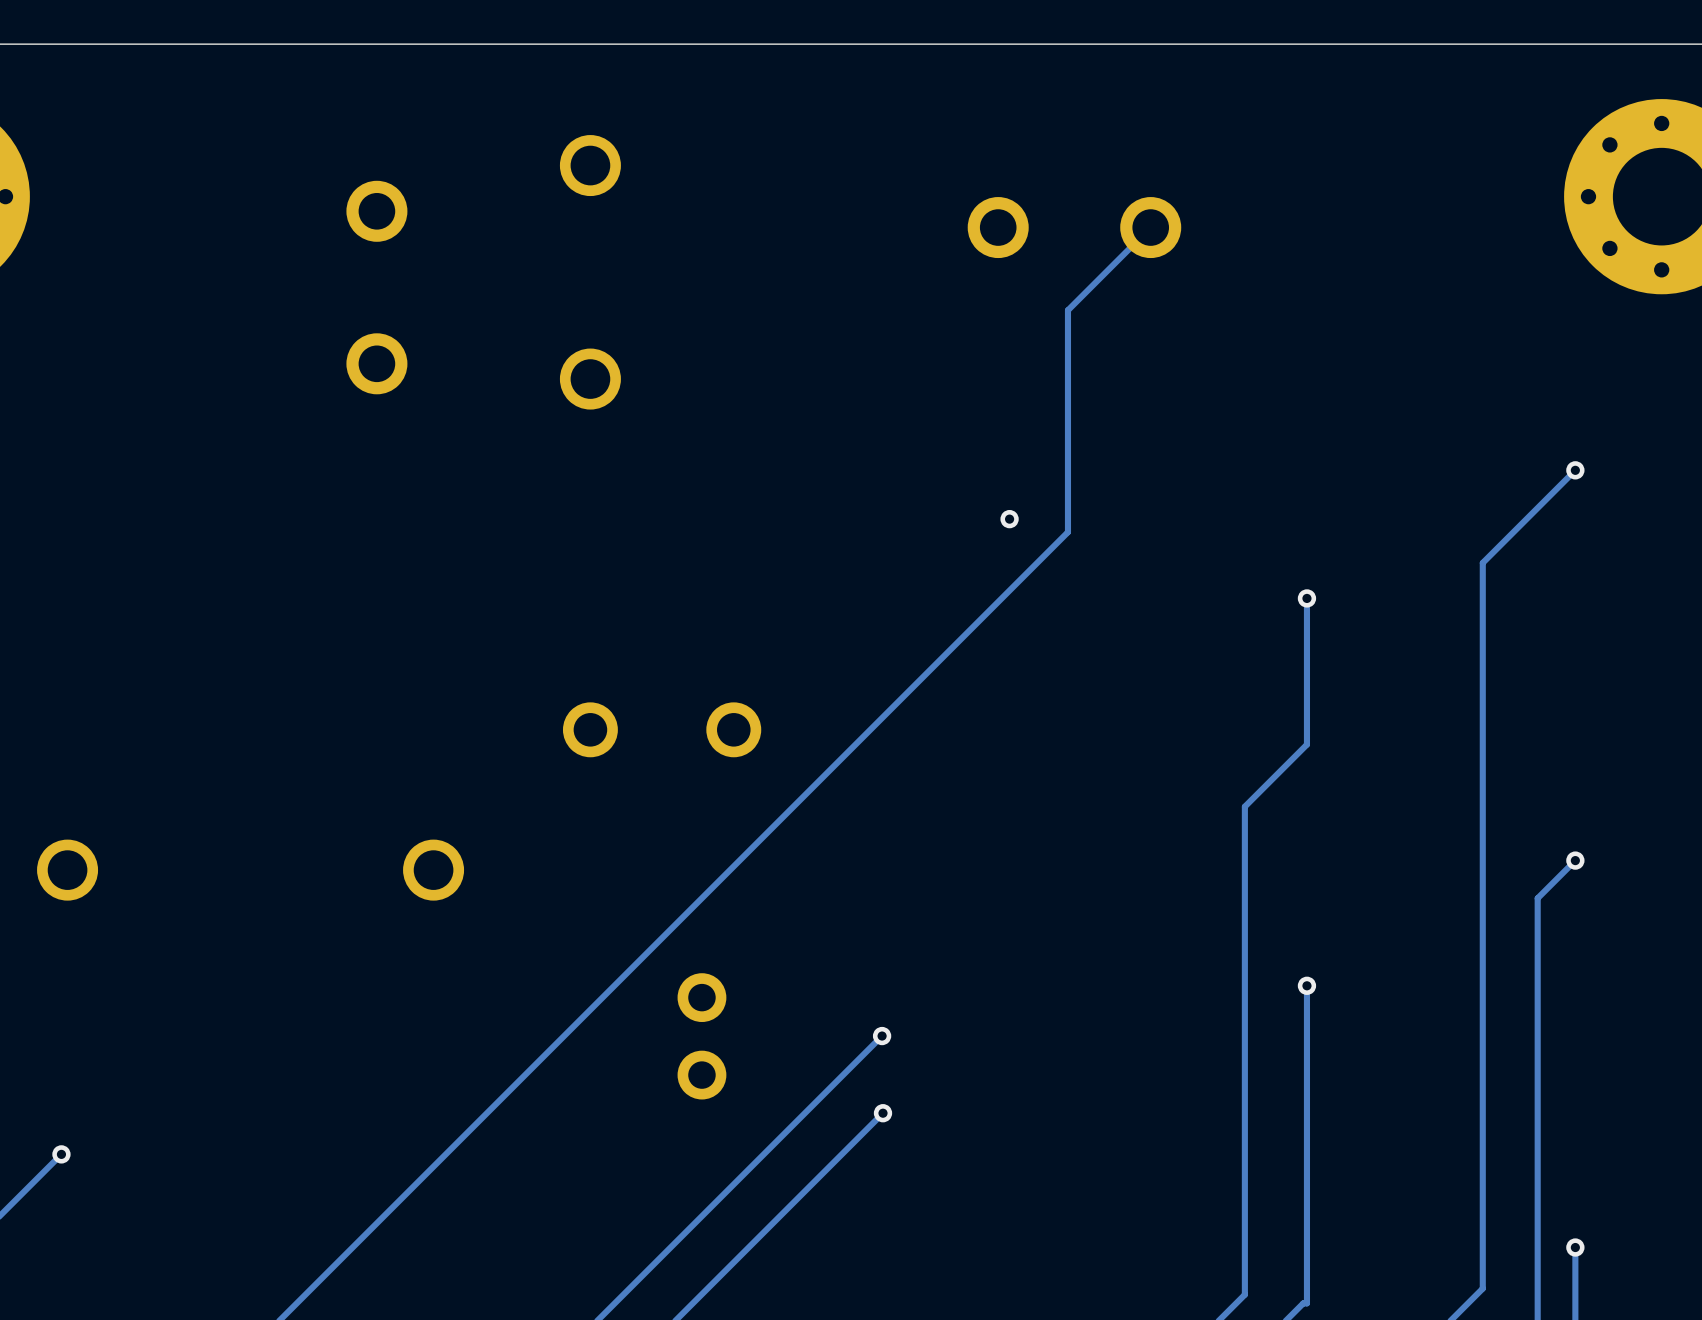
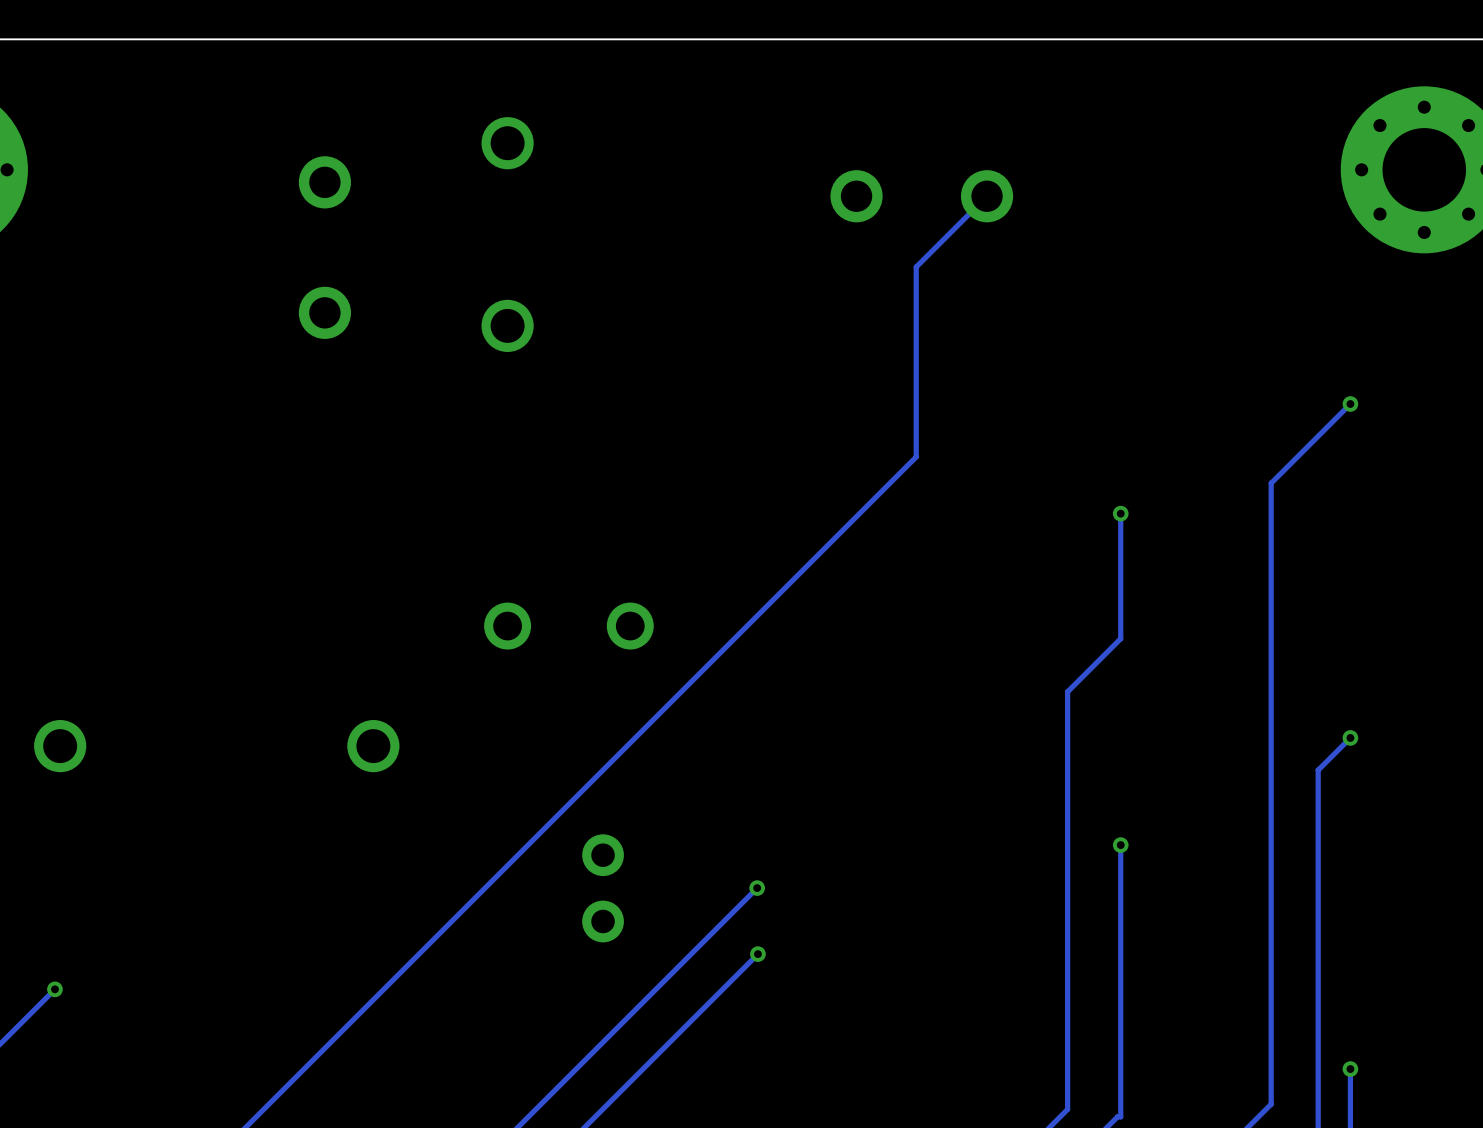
via: (1009, 519) -> none

